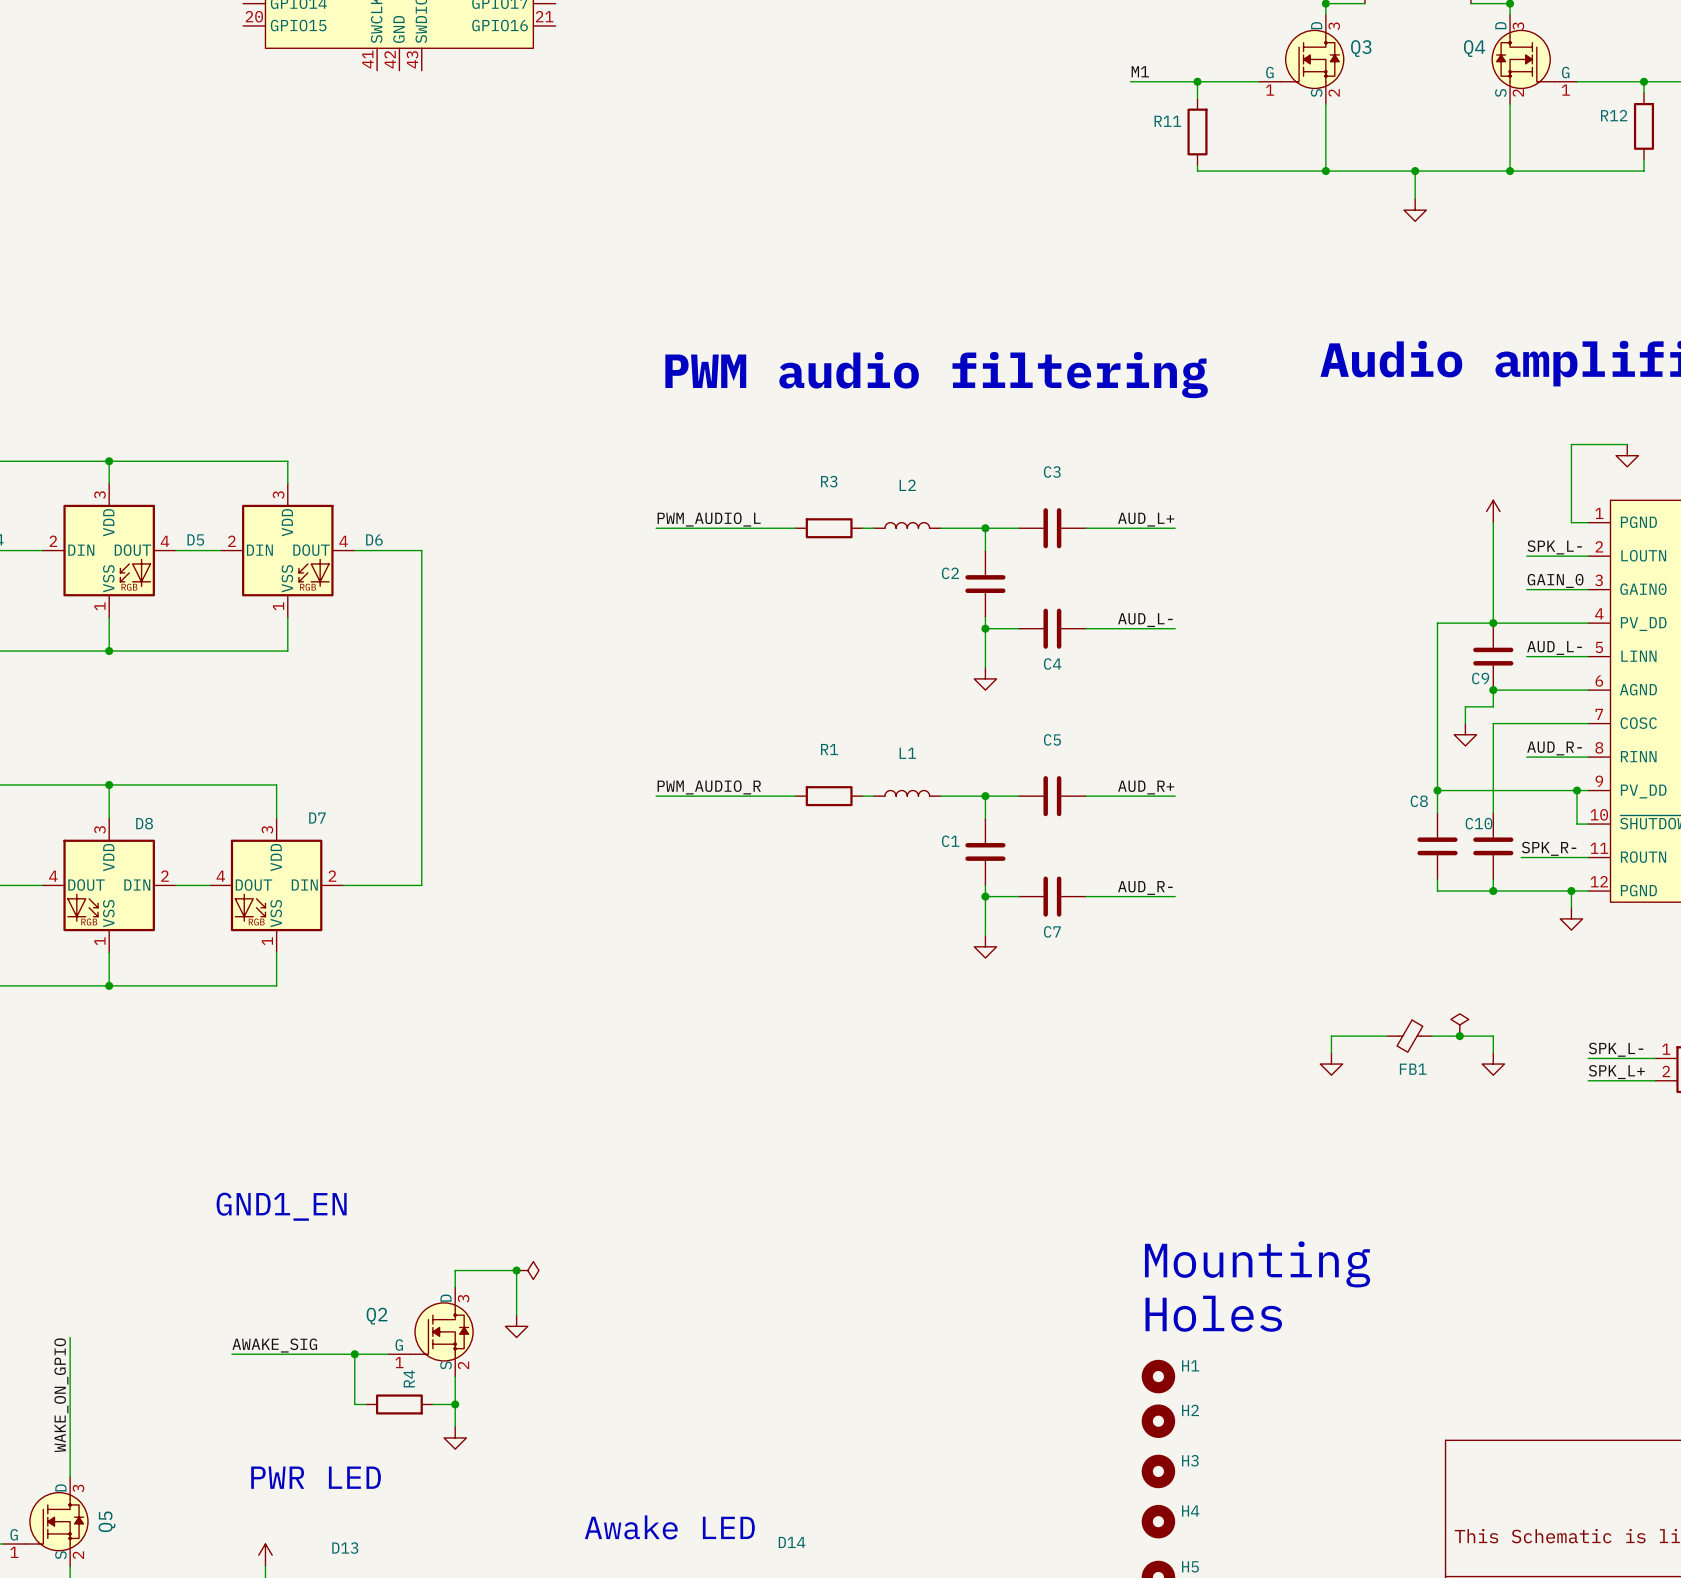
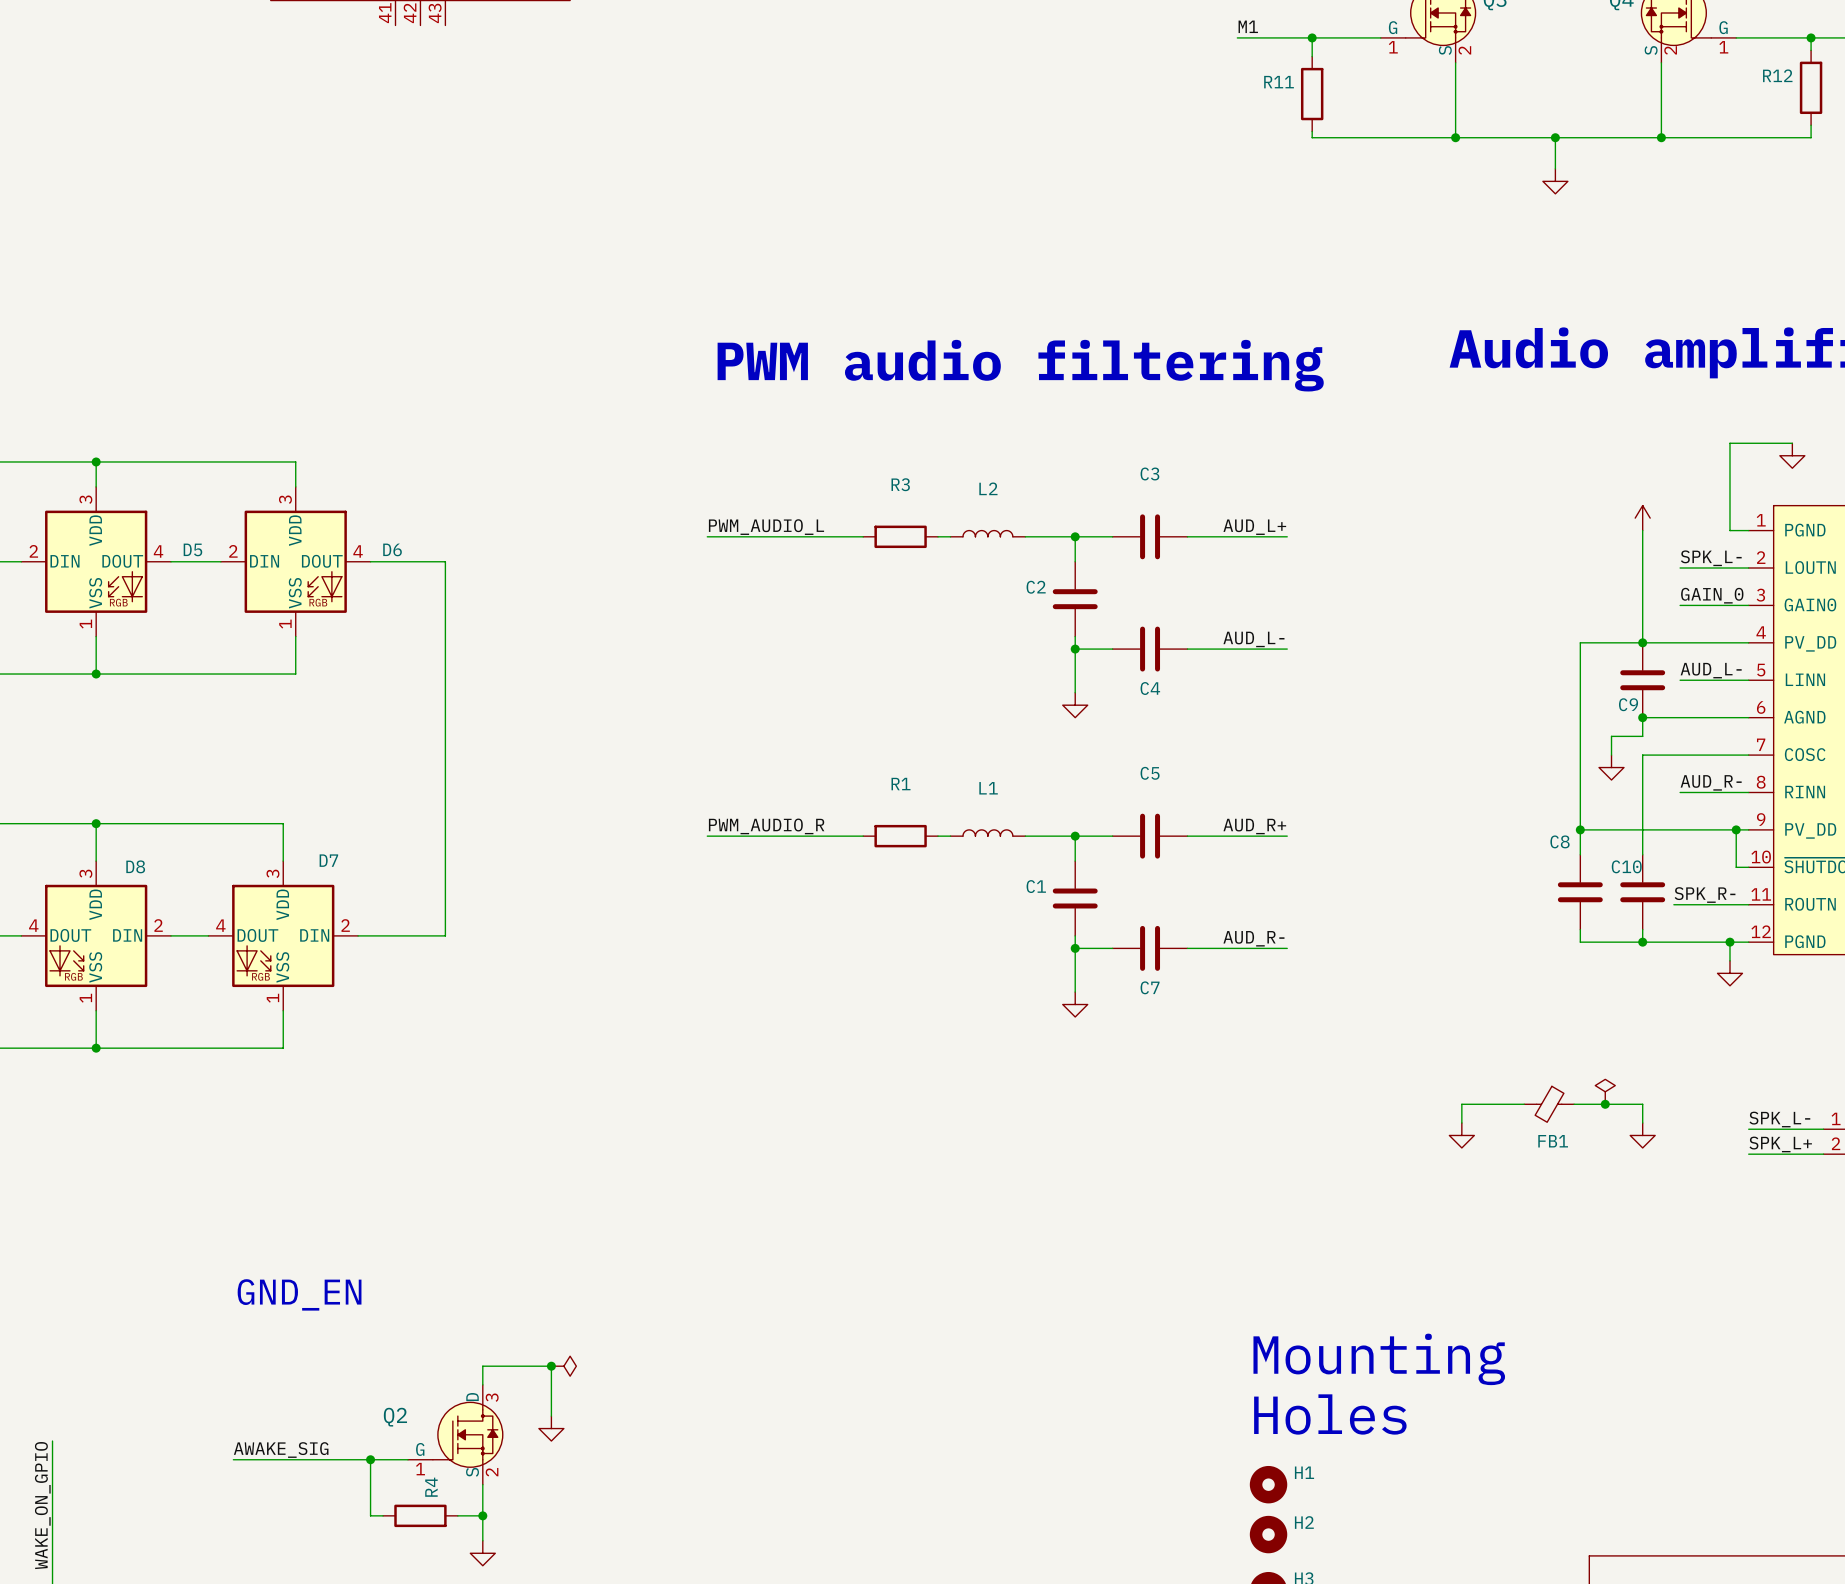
text: GND1_EN (281, 1206) -> GND_EN (299, 1294)

